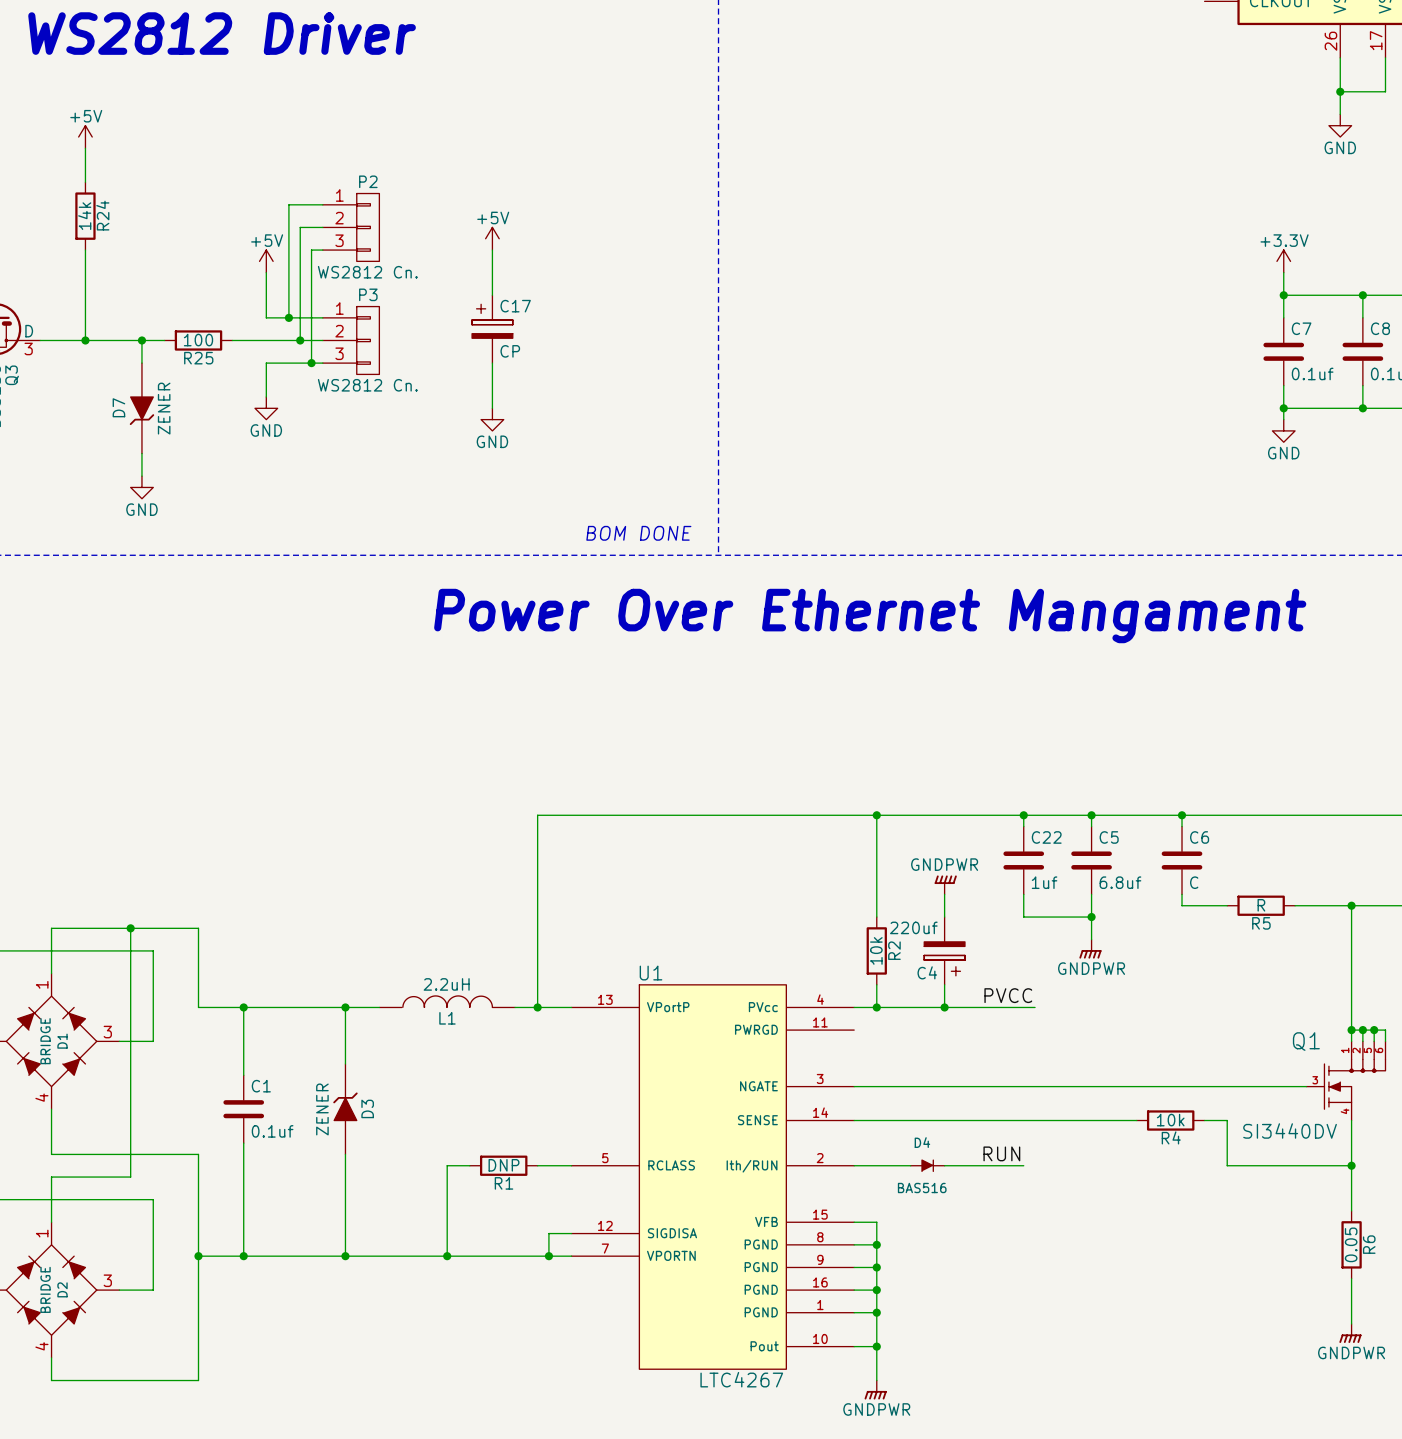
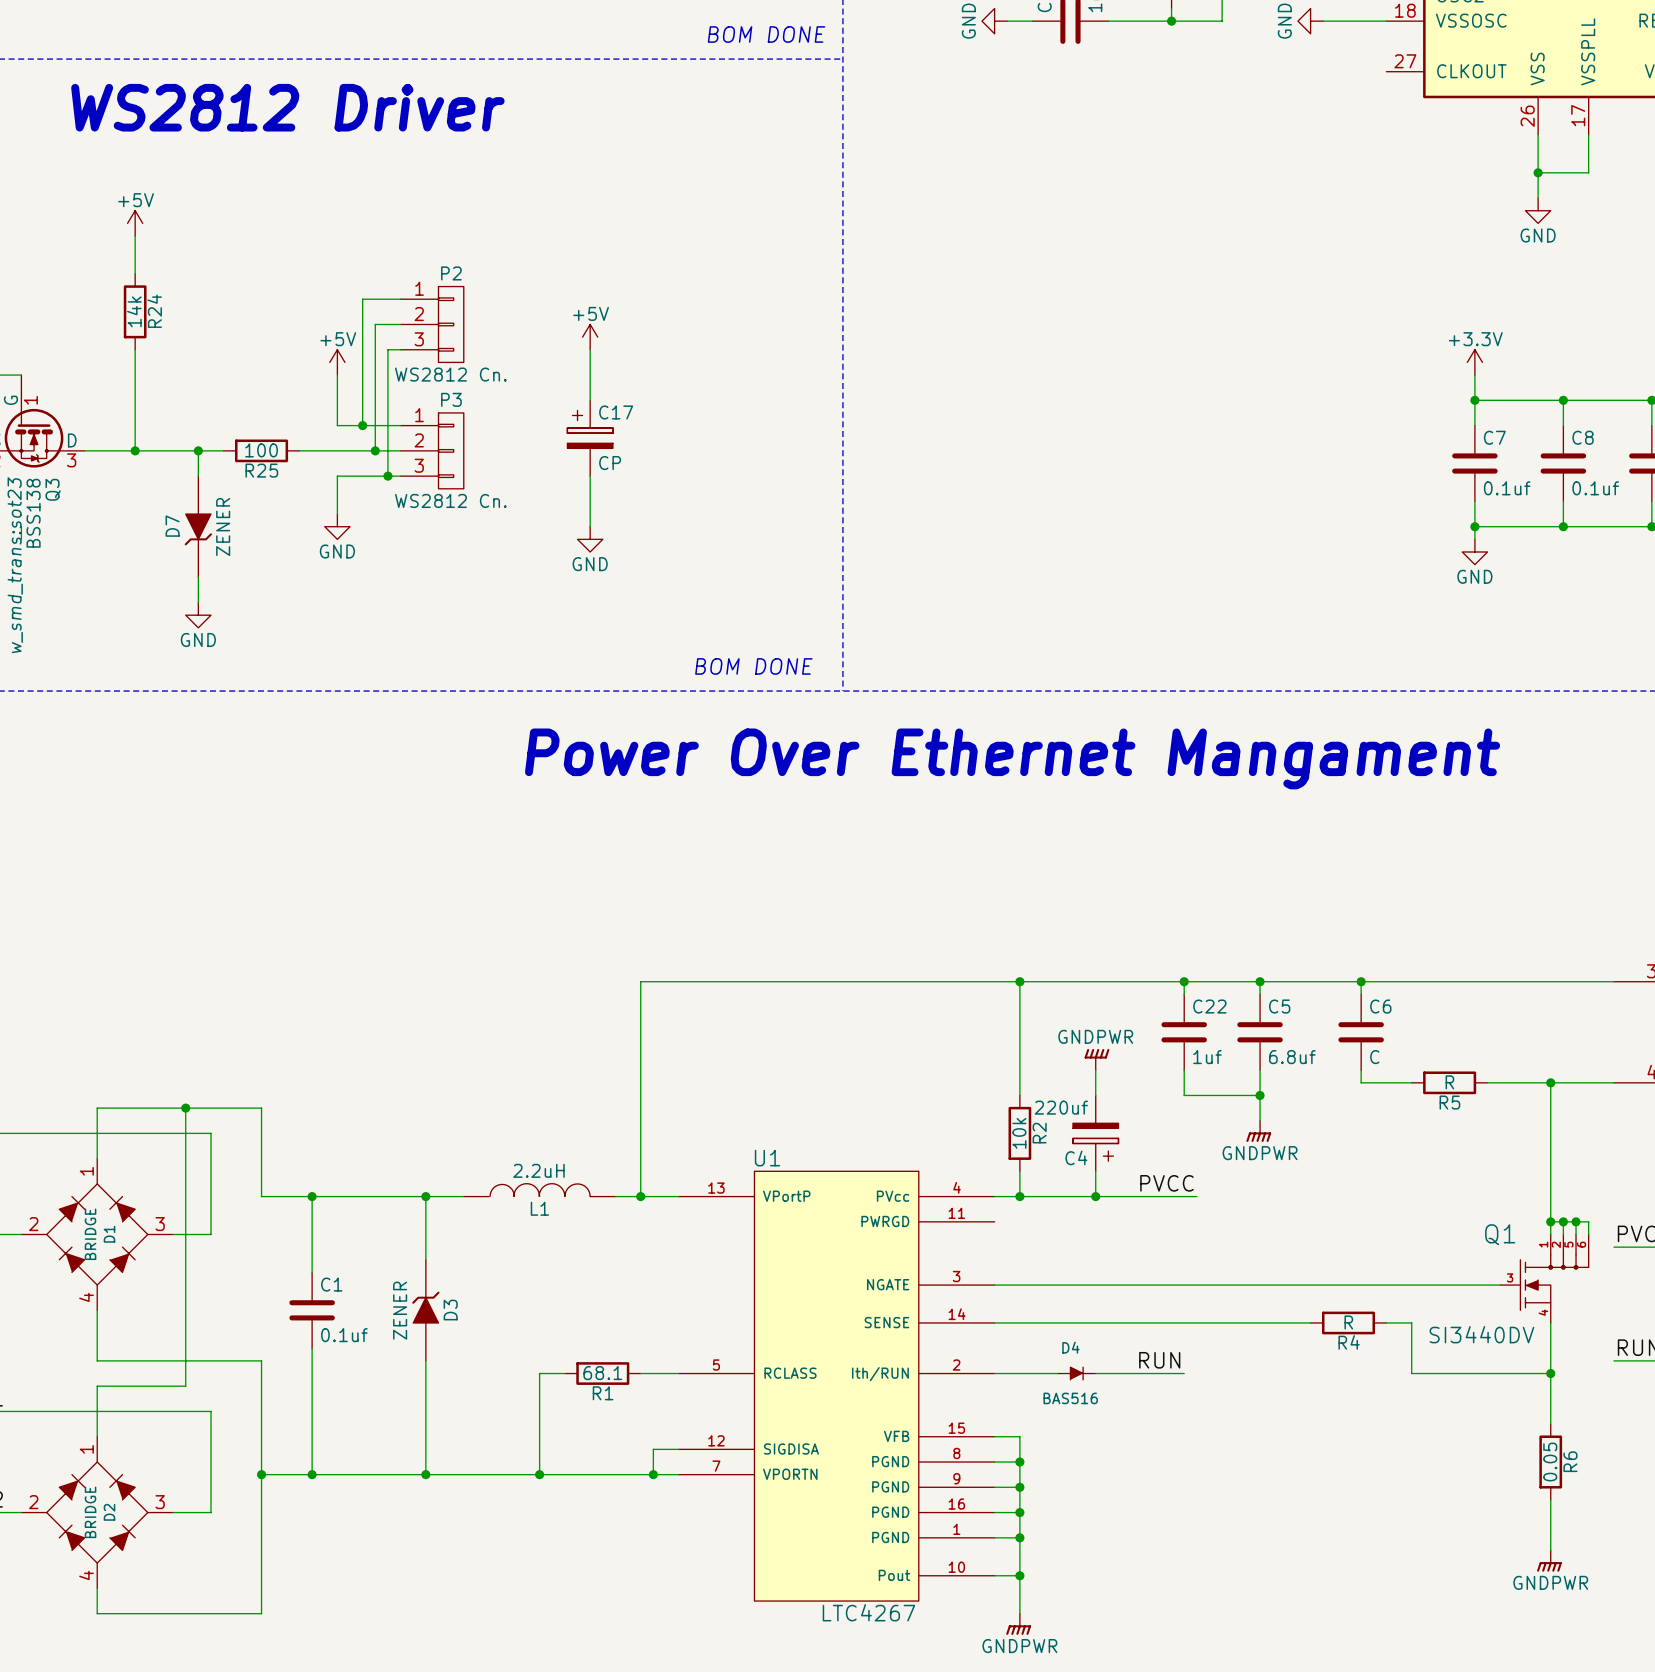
R4 value: 10k (1170, 1120) -> R (1348, 1322)
R1 value: DNP (503, 1165) -> 68.1 (602, 1373)

